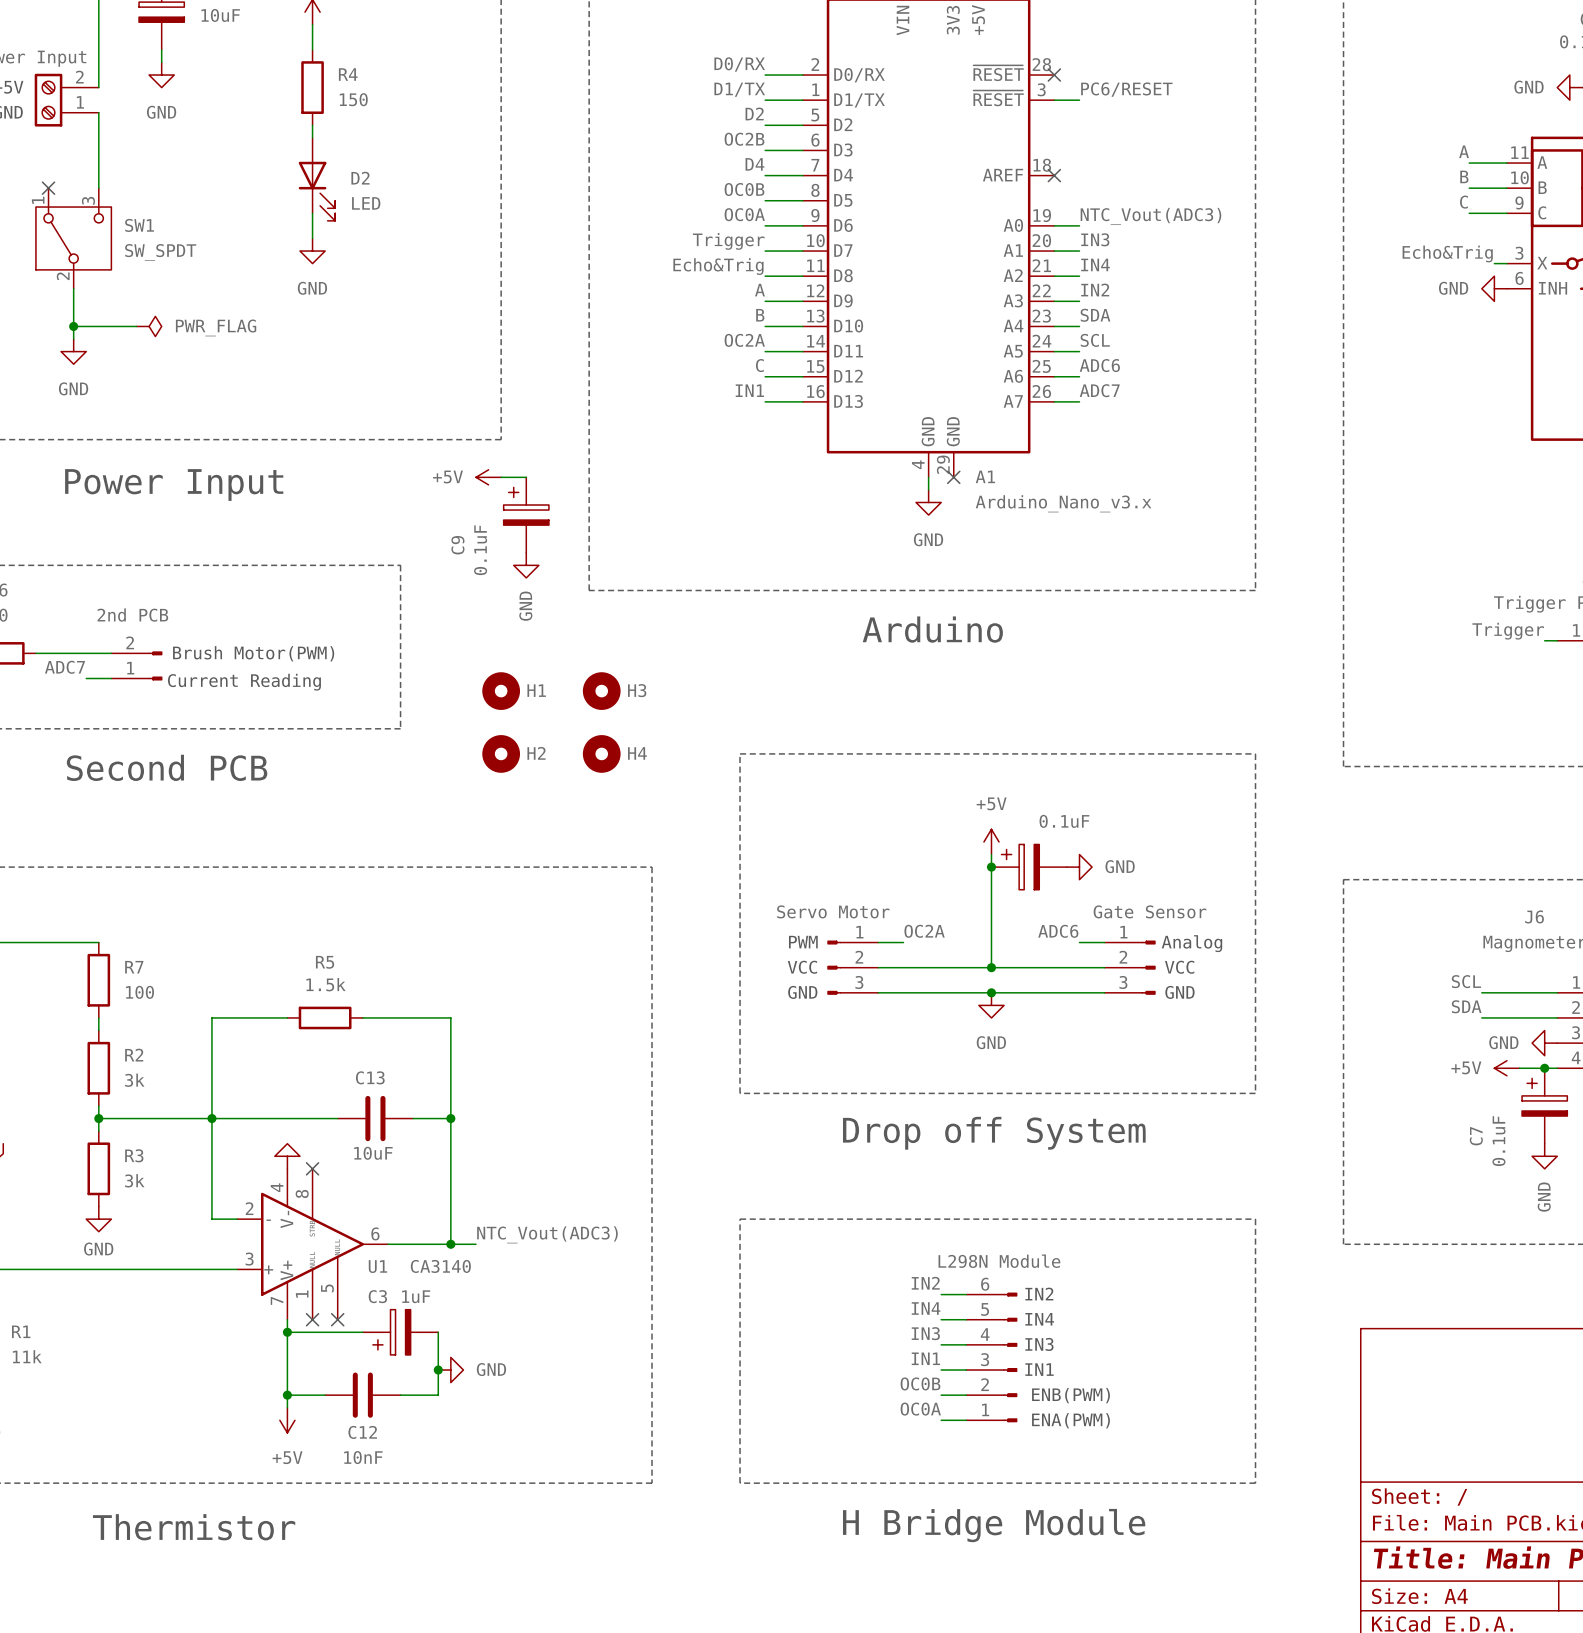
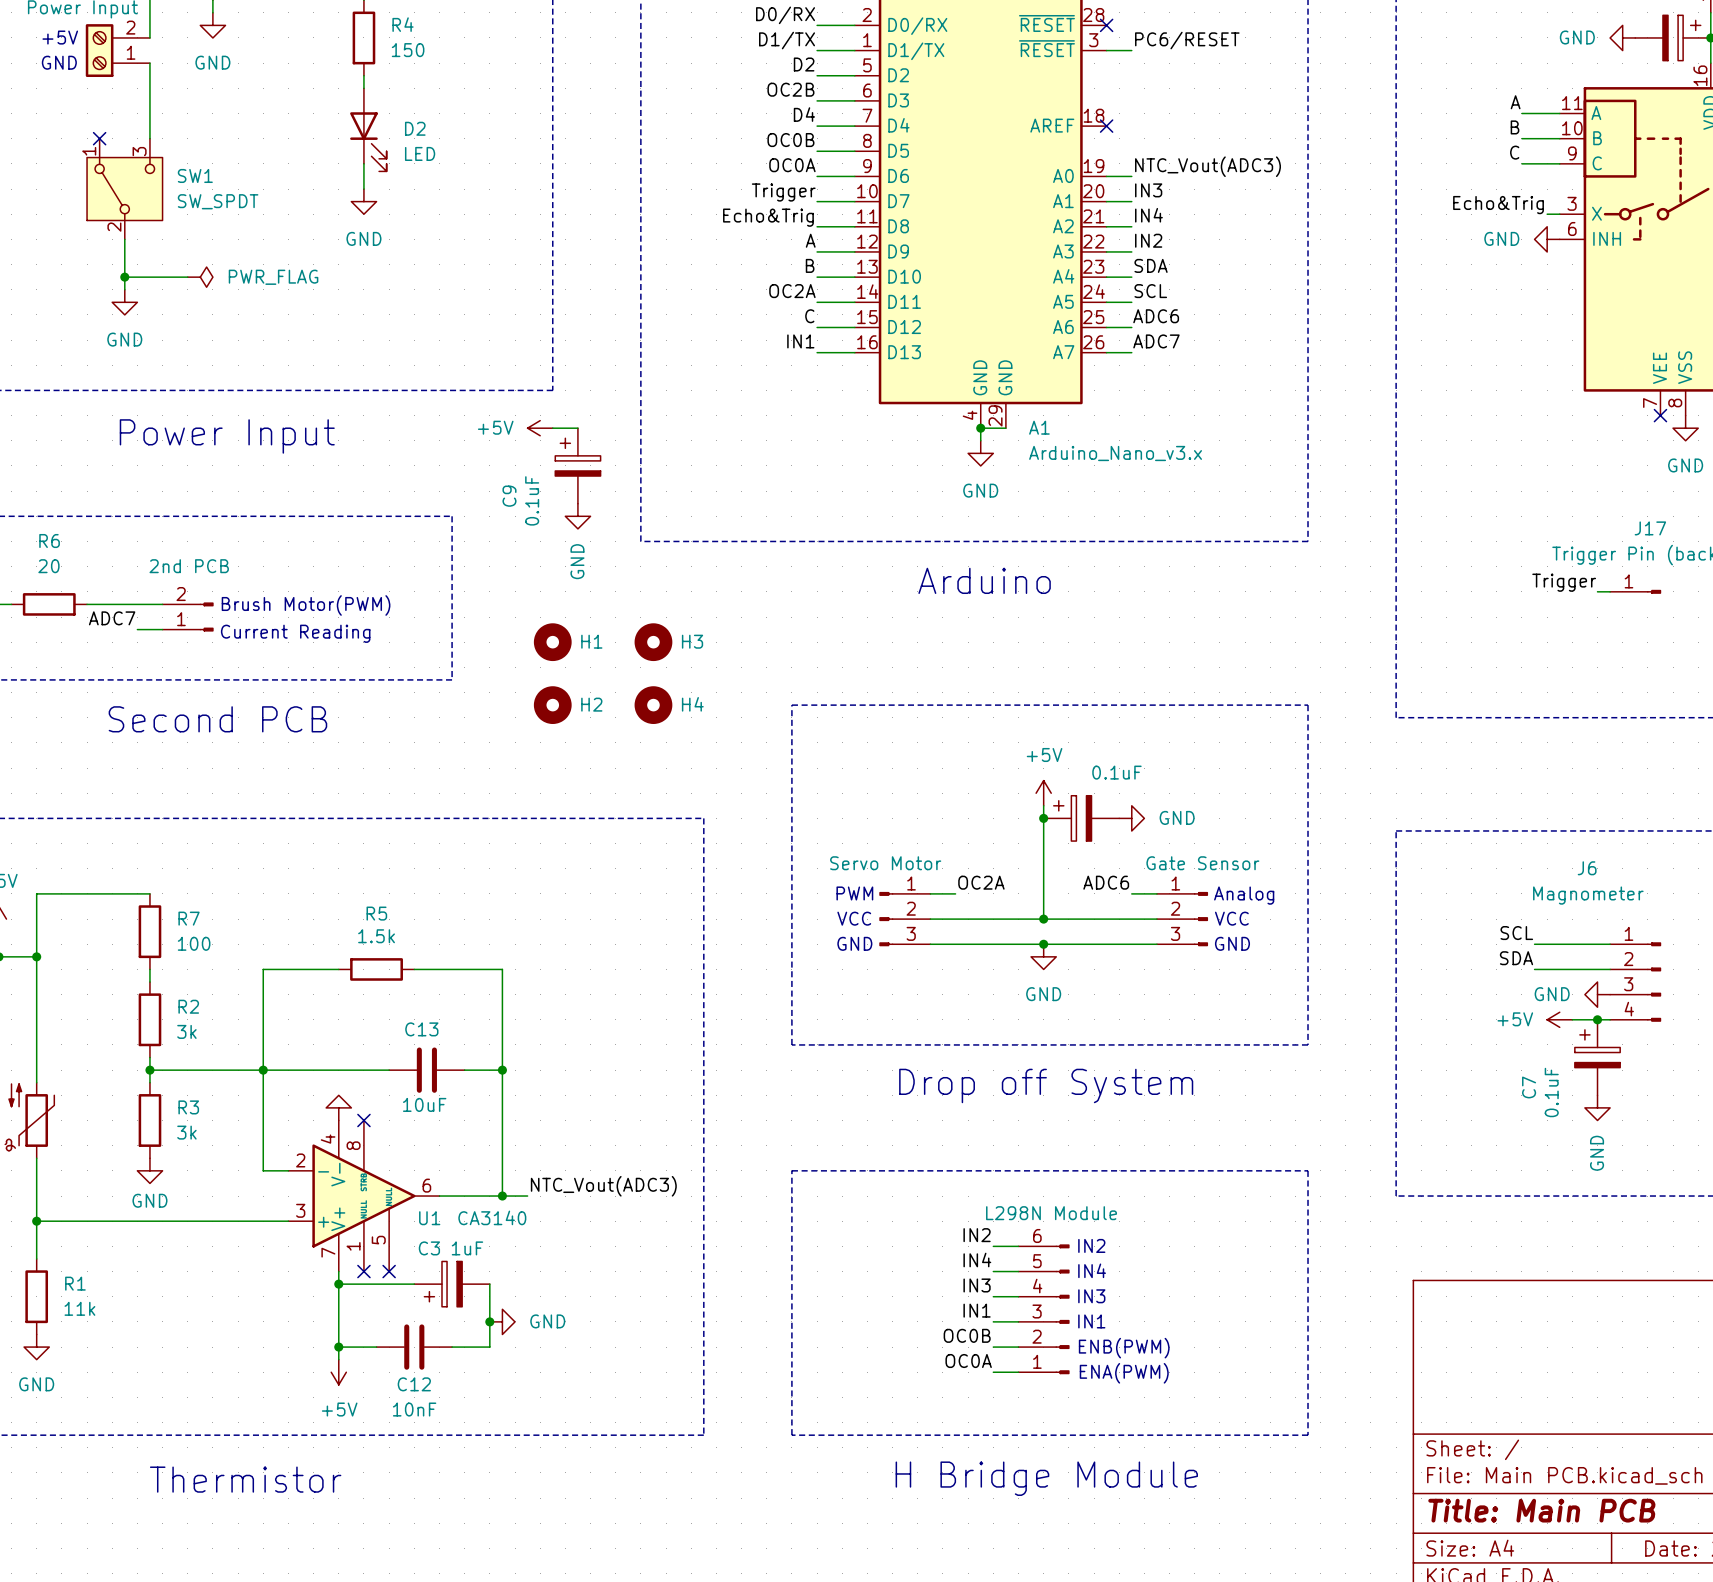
wire: none -> (980, 428) (1005, 428)
junction: none -> (980, 428)
no-connect mark: (953, 477) -> none

